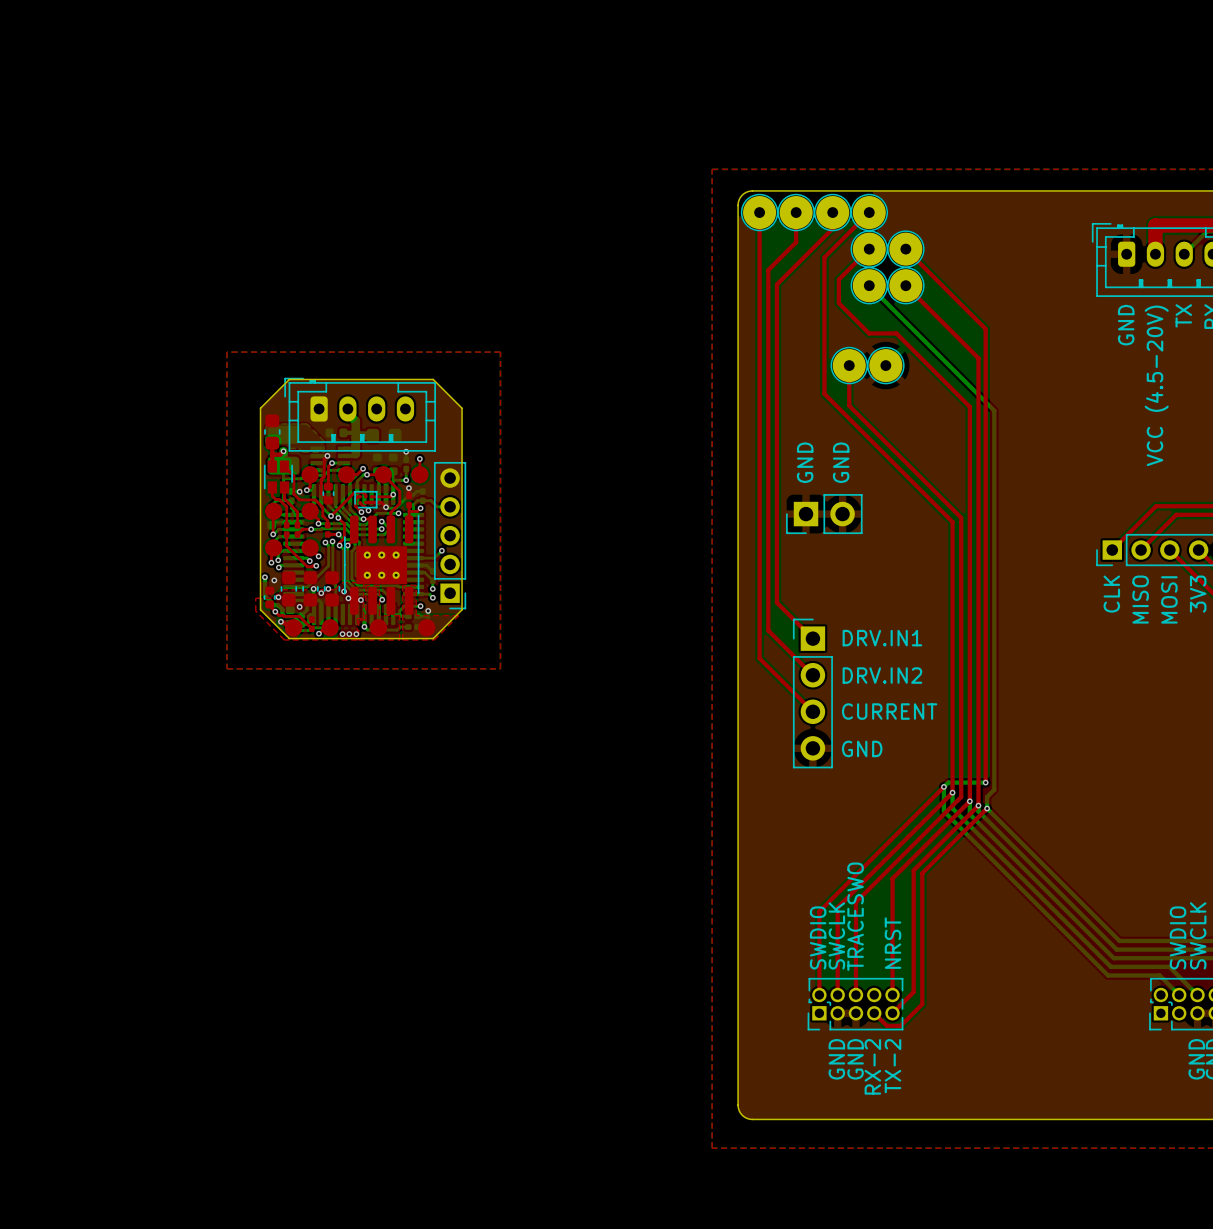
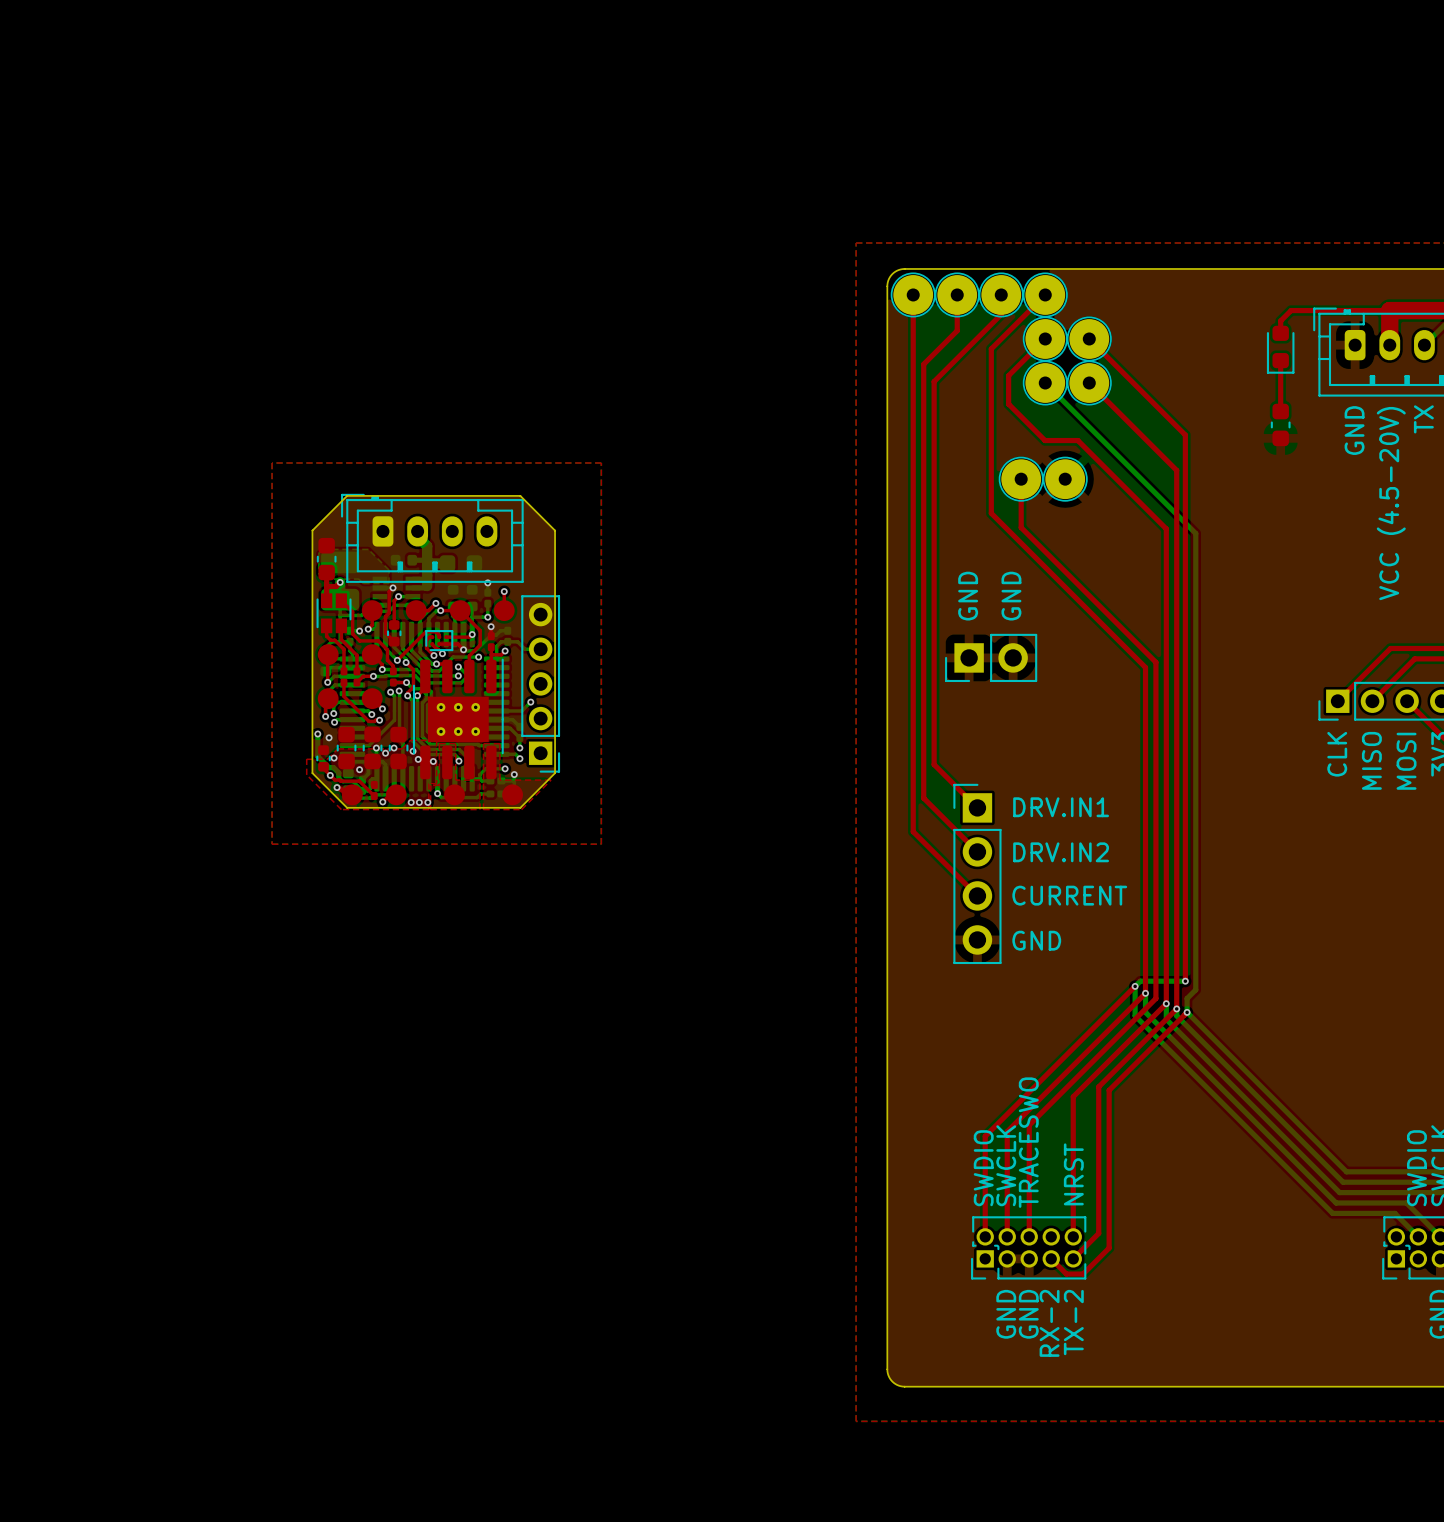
top track: none -> (1389, 310) (1291, 310) (1280, 320) (1280, 333)
part: none -> (1280, 349)
top track: none -> (1280, 360) (1280, 411)
part: none -> (1280, 424)

